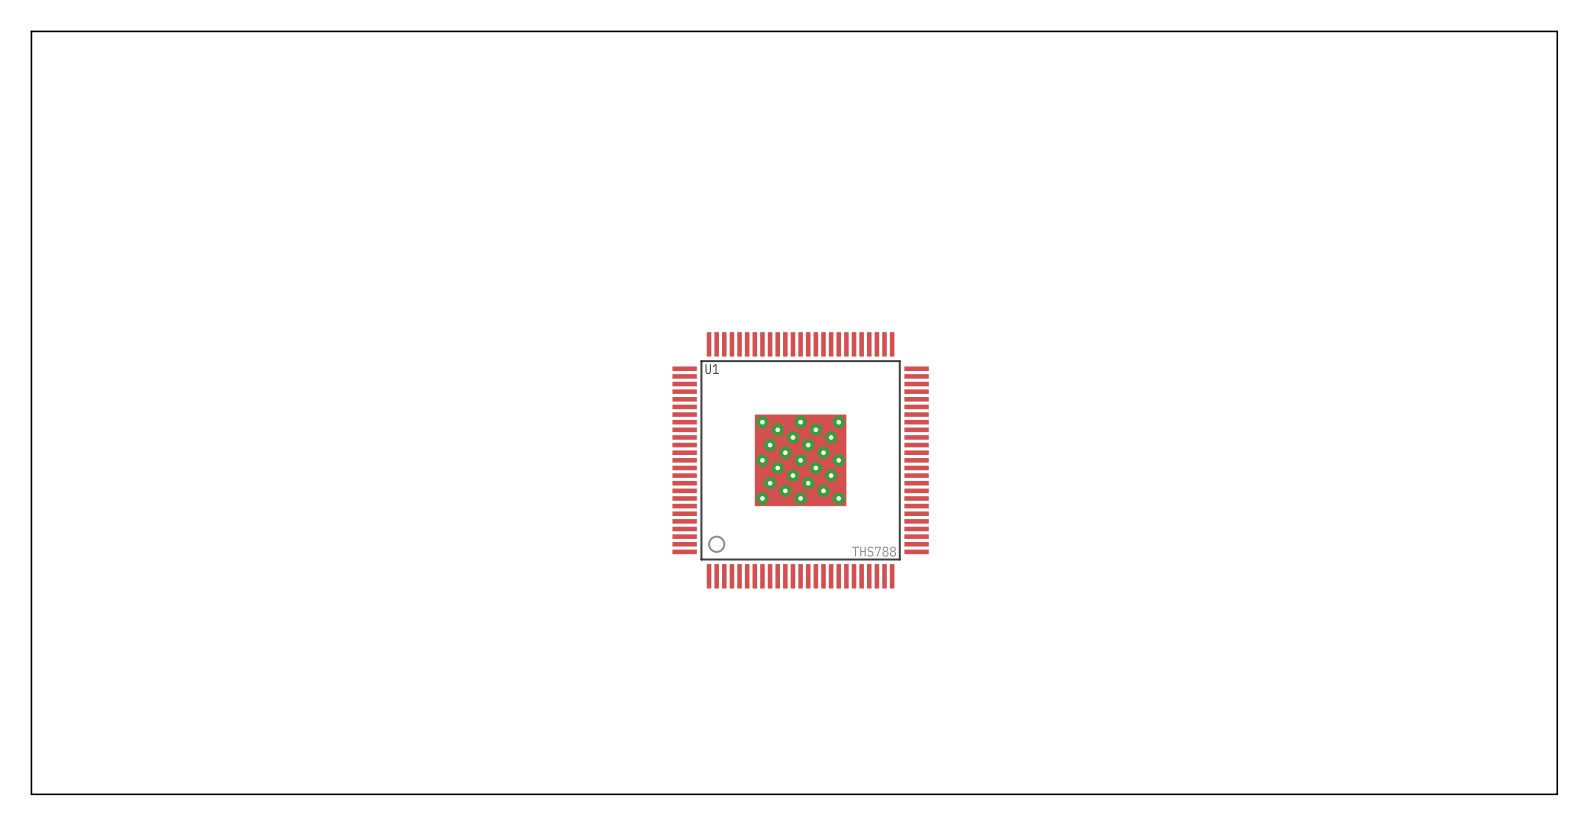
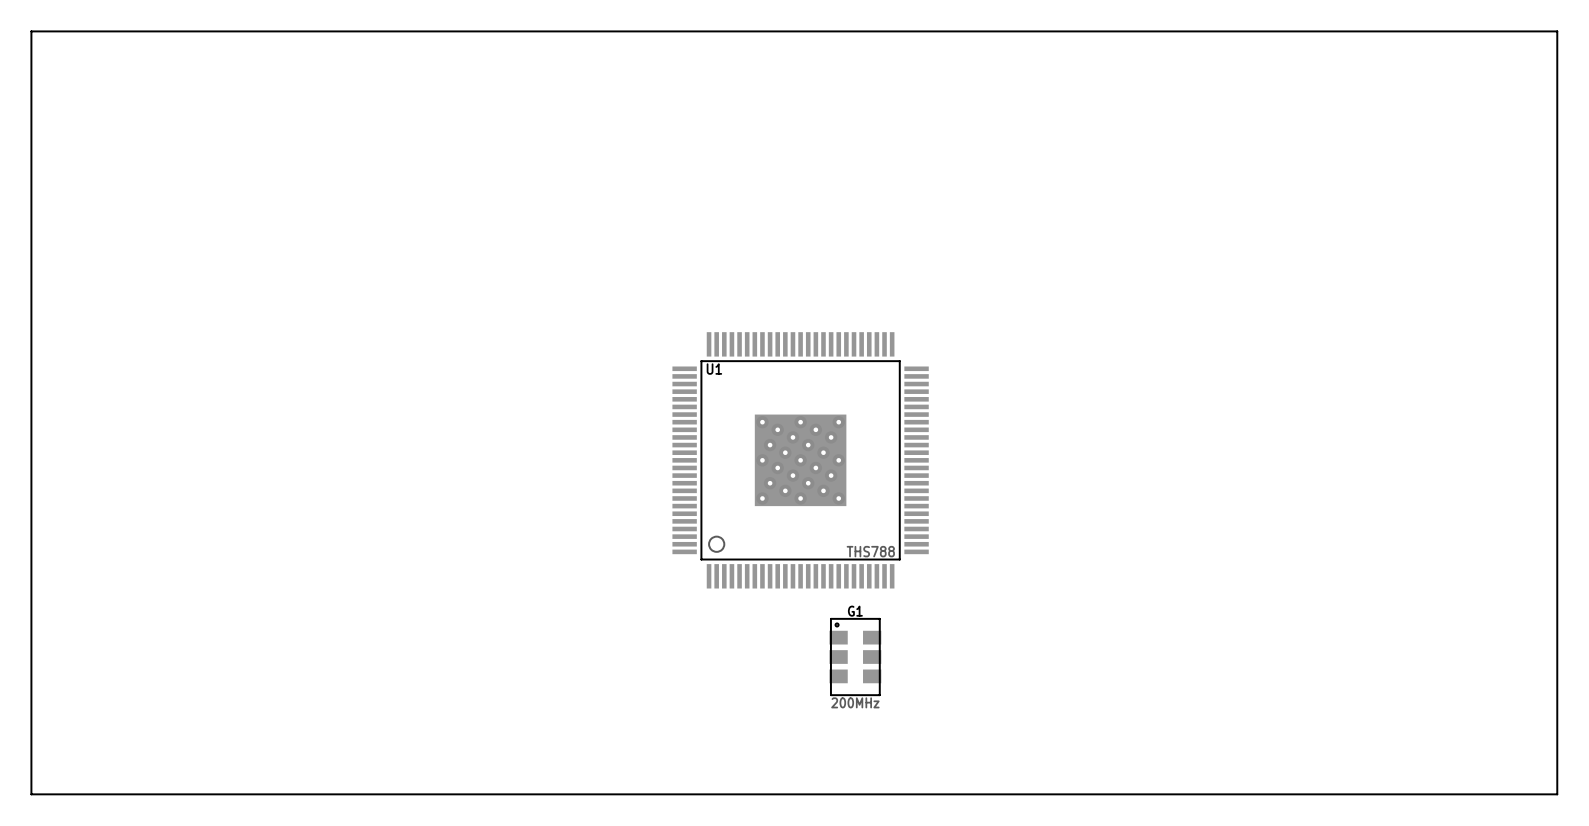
G1: none -> 200MHz (855, 657)

